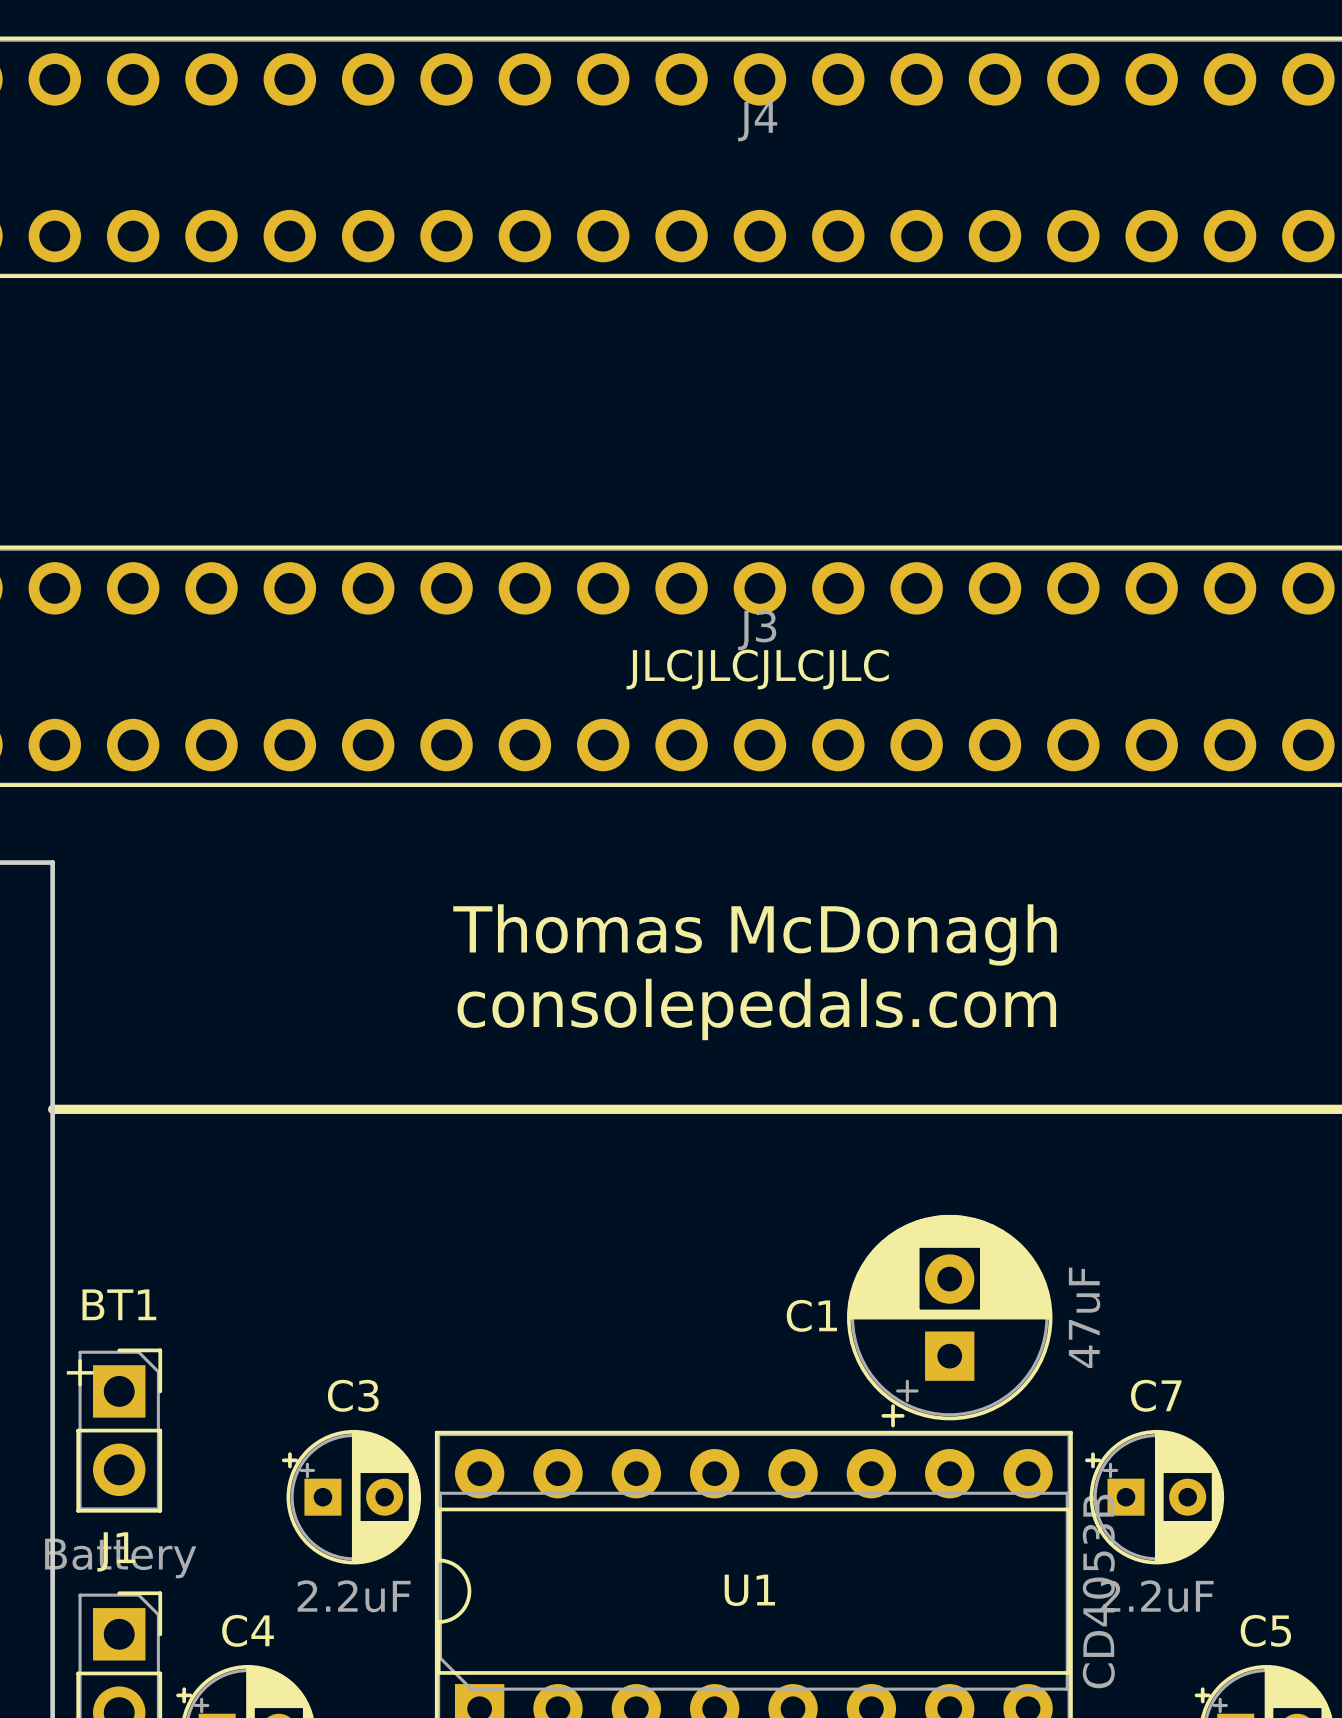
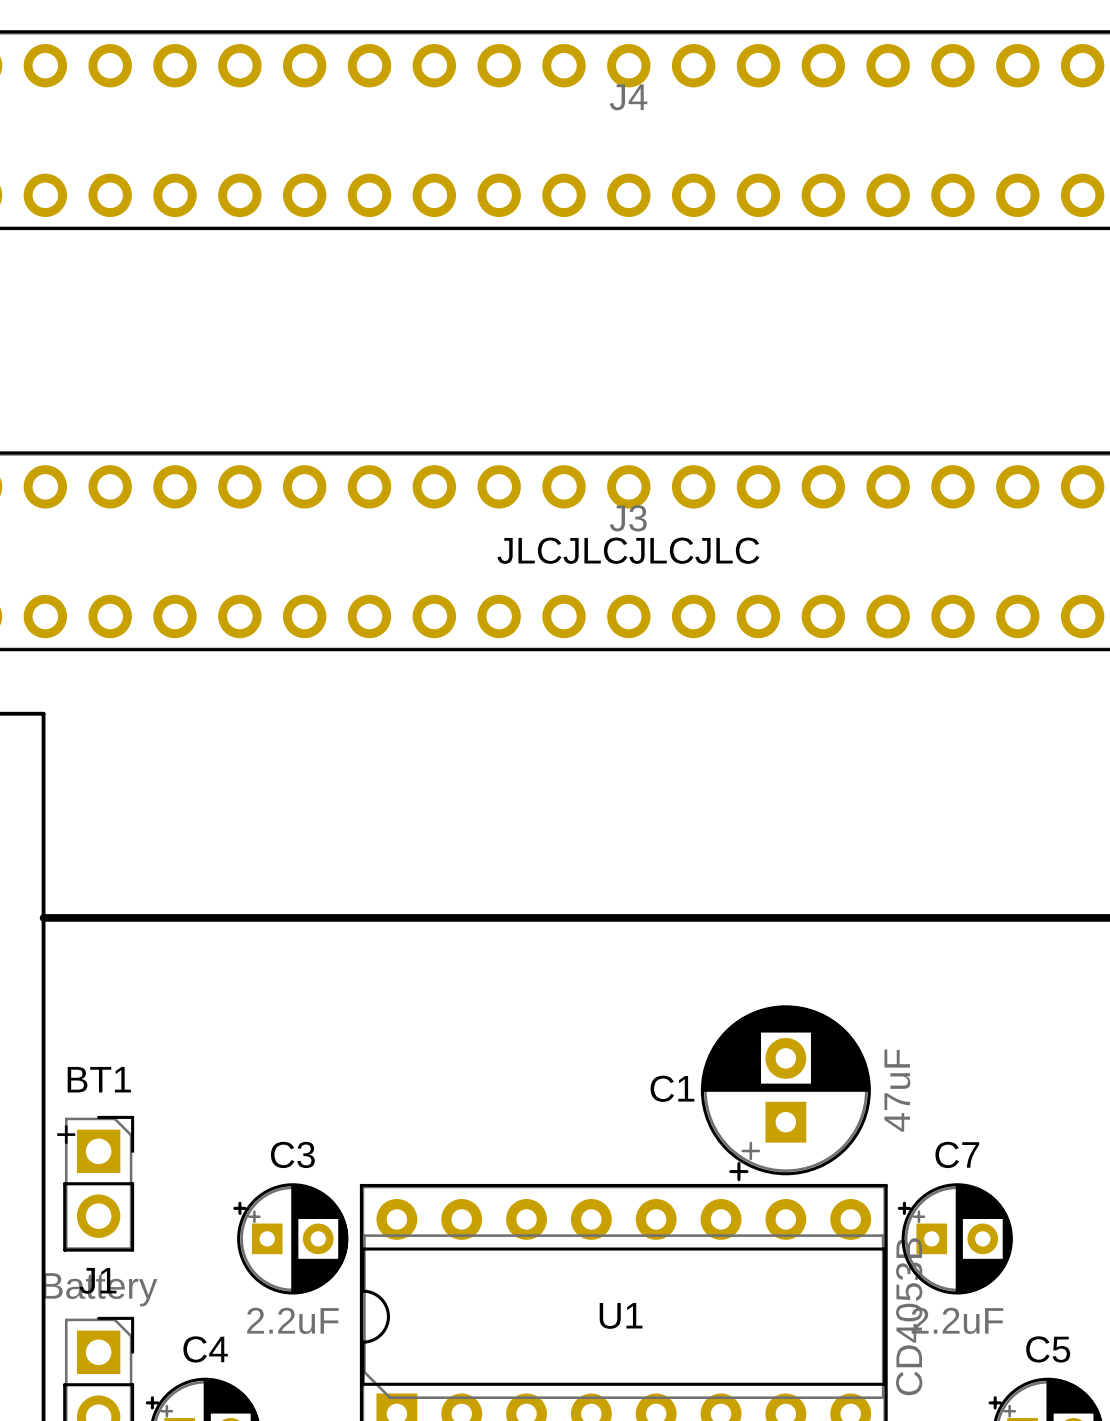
text: Thomas McDonagh (754, 934) -> none
text: consolepedals.com (756, 1009) -> none

